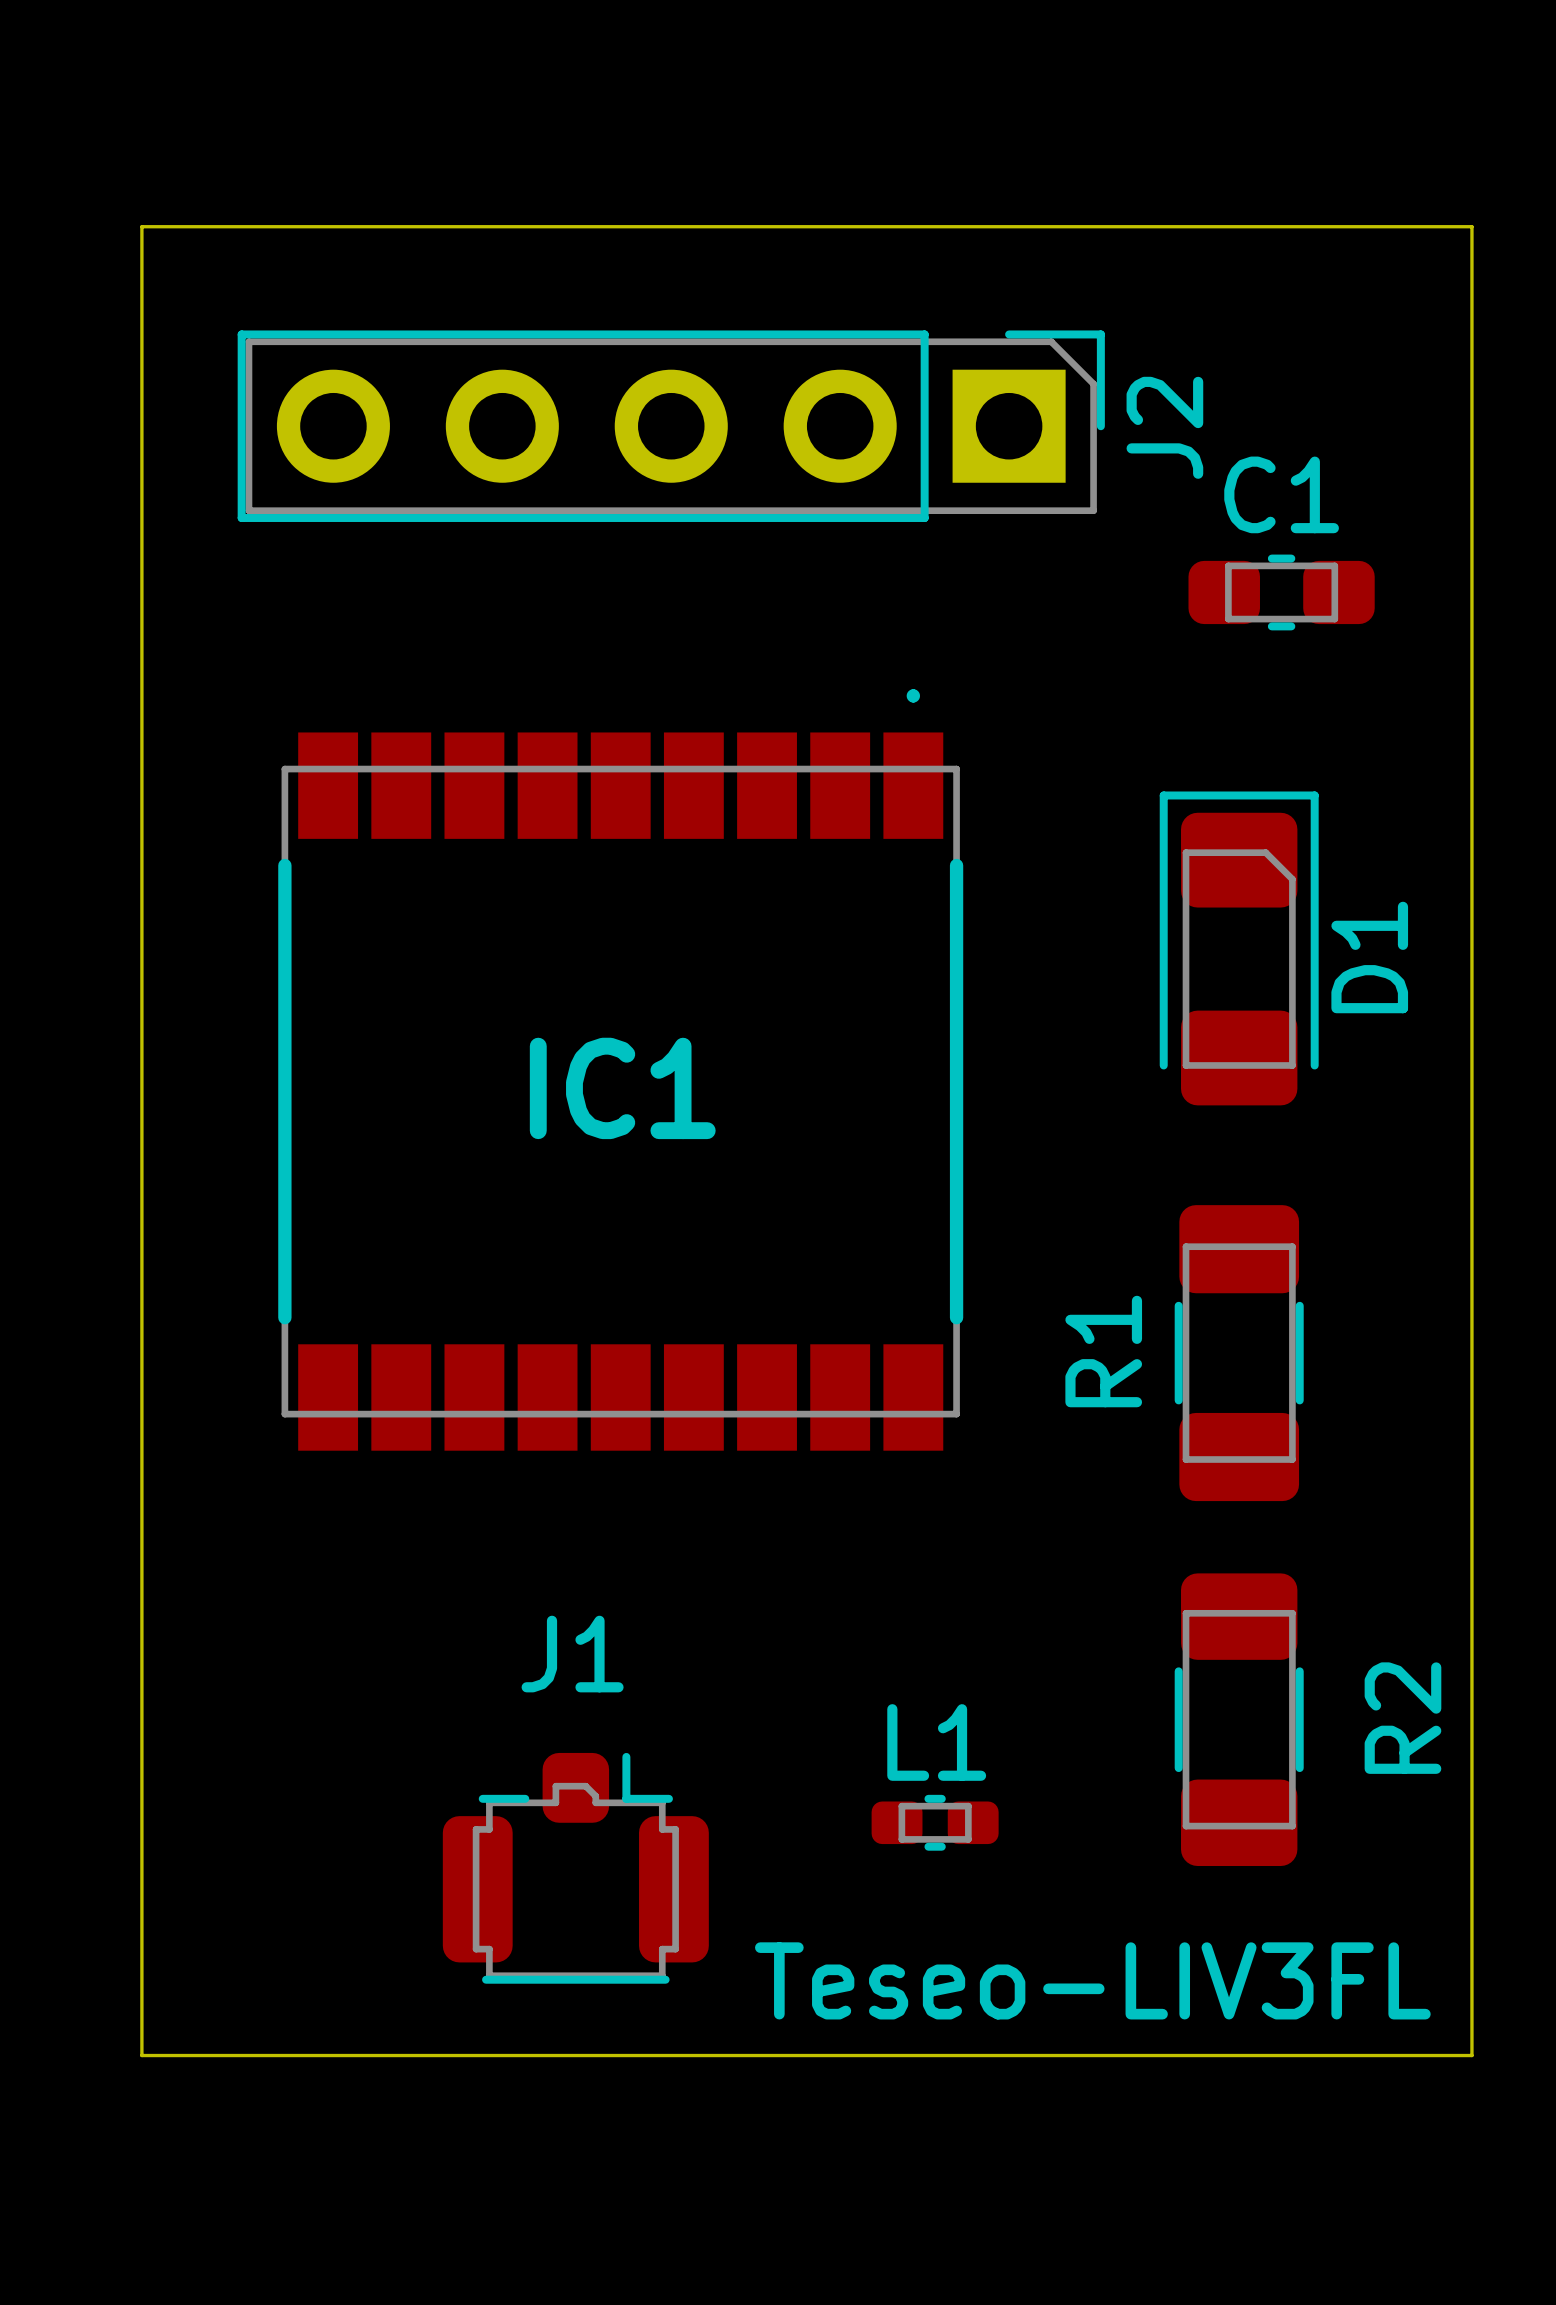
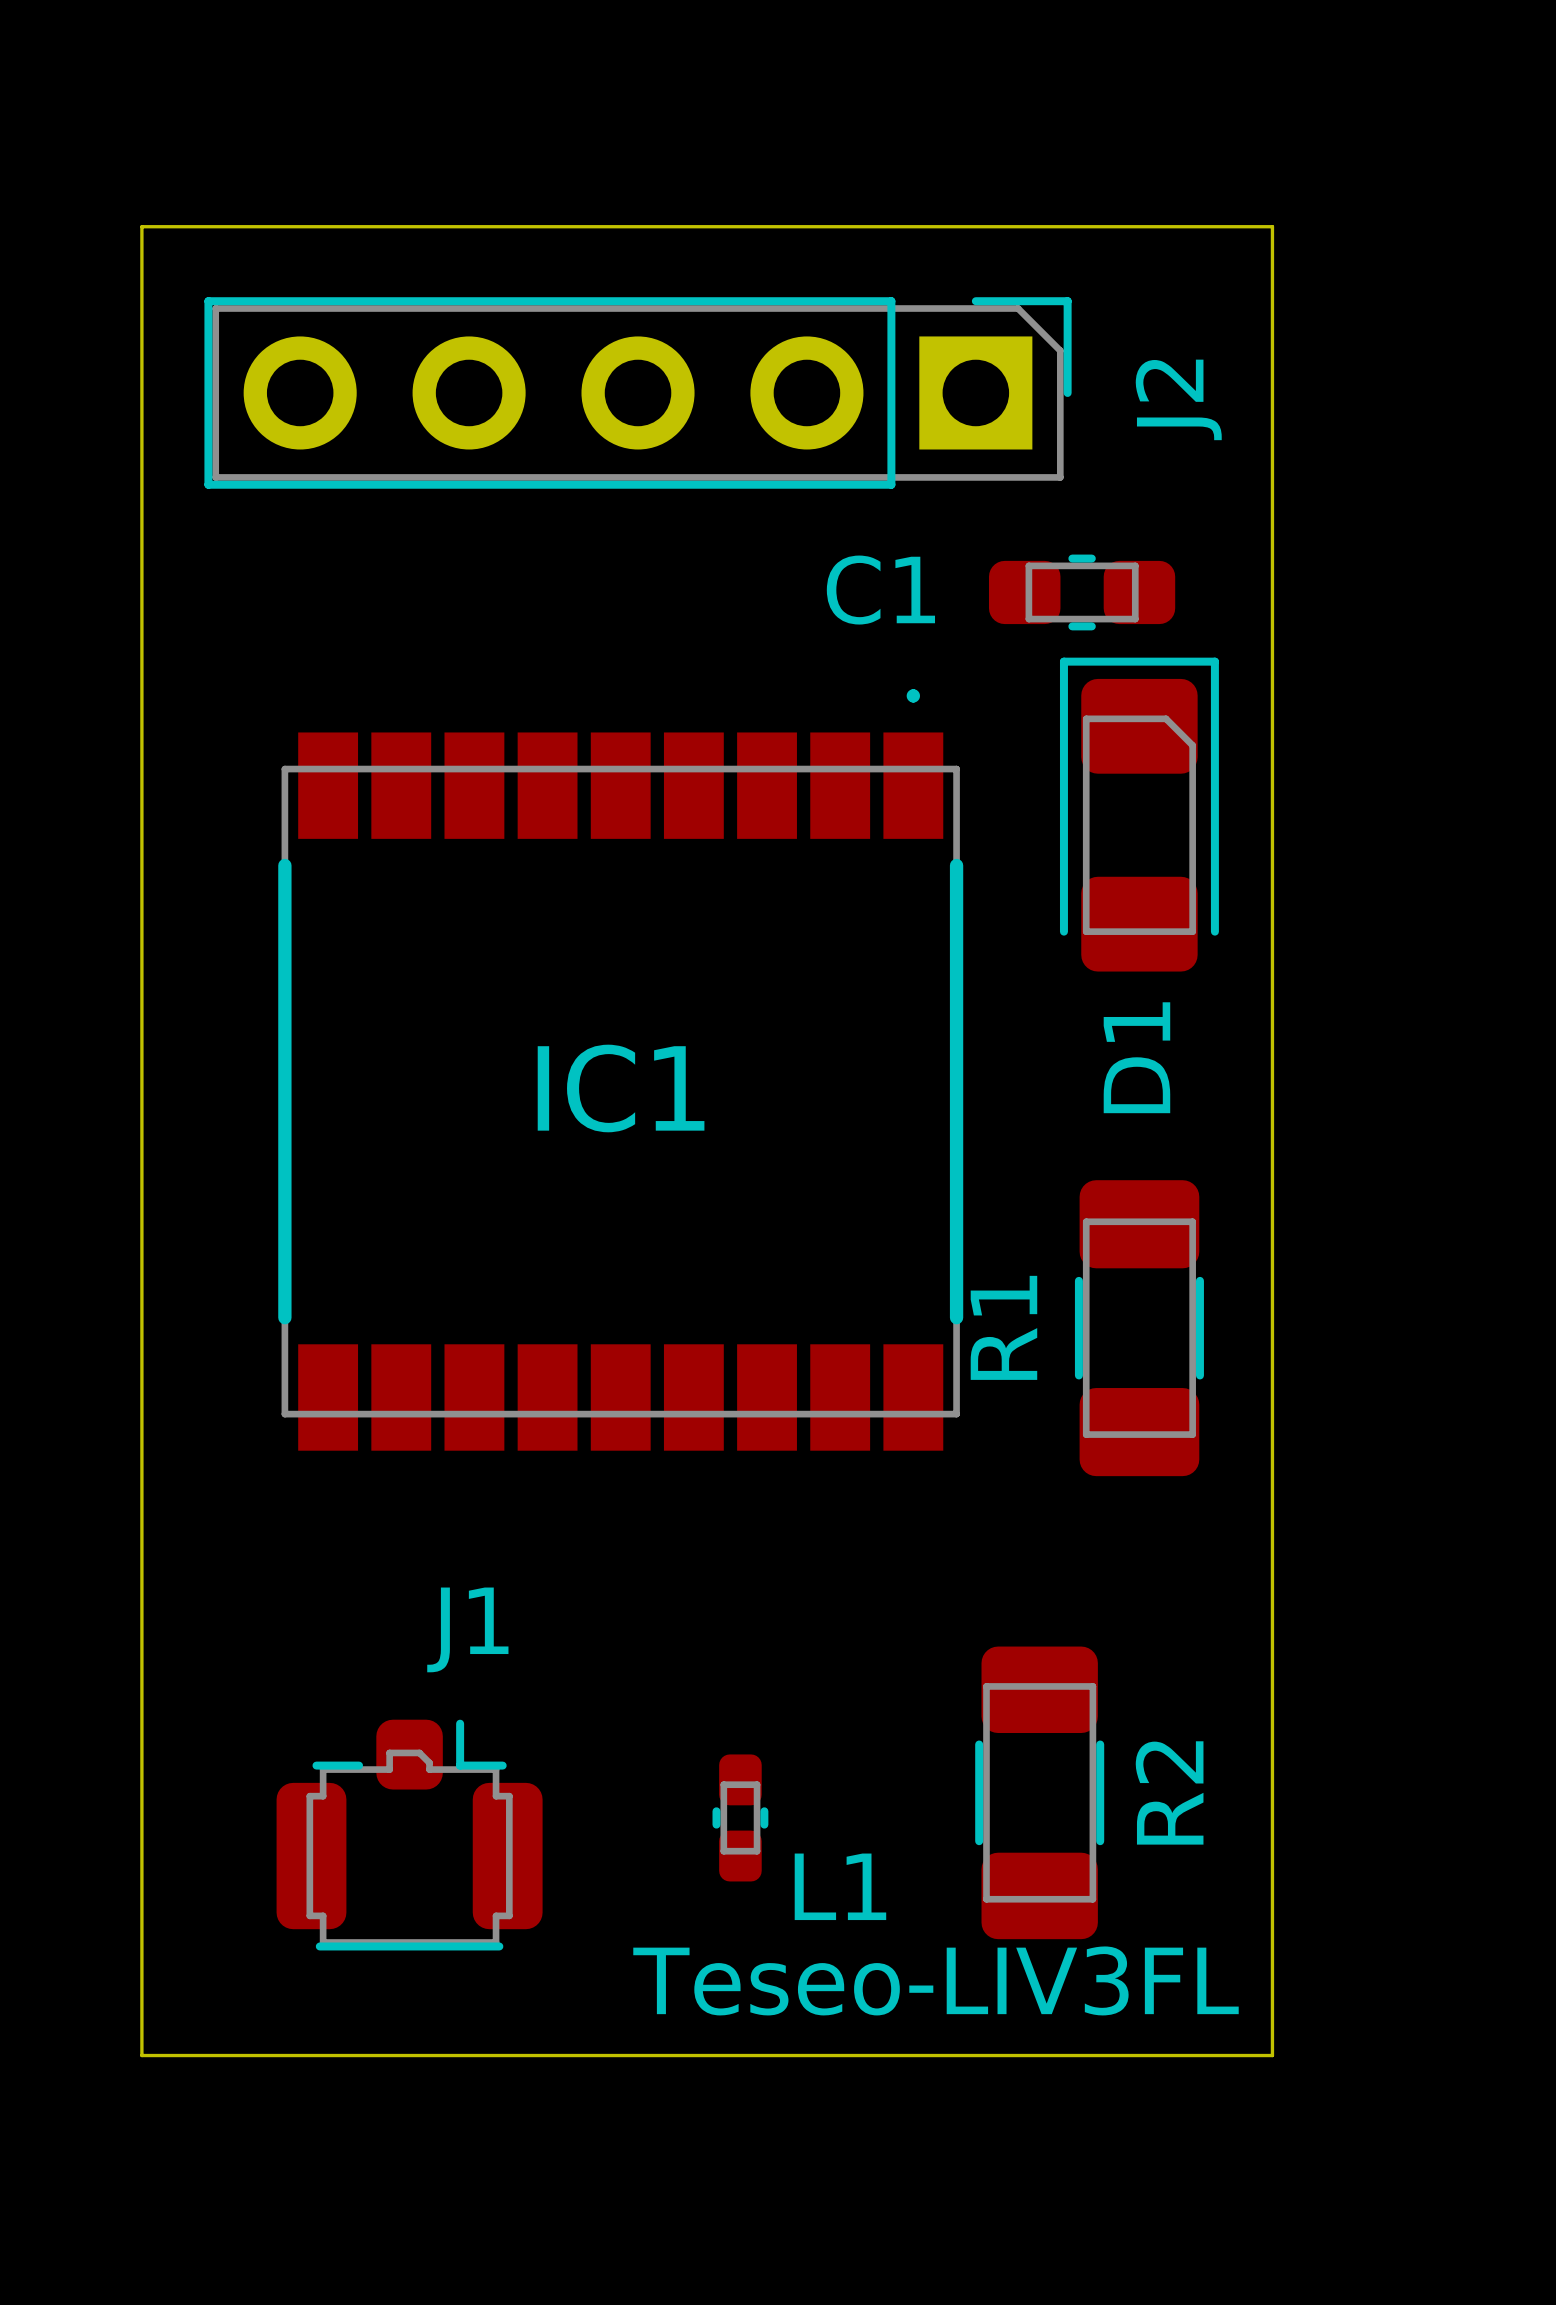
board edge: (1272, 226) (1471, 226) (1471, 2055) (1272, 2055) -> (1272, 226) (1272, 2055)
J2 position: (671, 426) -> (638, 392)
J2 name position: J2 (1164, 427) -> J2 (1178, 399)
C1 name position: C1 (1281, 494) -> C1 (880, 590)
C1 position: (1281, 592) -> (1082, 592)
D1 position: (1239, 948) -> (1139, 814)
D1 name position: D1 (1369, 957) -> D1 (1136, 1057)
R1 position: (1239, 1353) -> (1139, 1328)
J1 name position: J1 (572, 1654) -> J1 (467, 1629)
R2 name position: R2 (1402, 1718) -> R2 (1169, 1792)
R2 position: (1239, 1719) -> (1039, 1792)
L1 rotation: 0° (935, 1822) -> 90° clockwise (740, 1817)
L1 position: (935, 1822) -> (740, 1817)
J1 position: (575, 1868) -> (409, 1835)
text position: Teseo-LIV3FL (1092, 1980) -> Teseo-LIV3FL (935, 1980)

